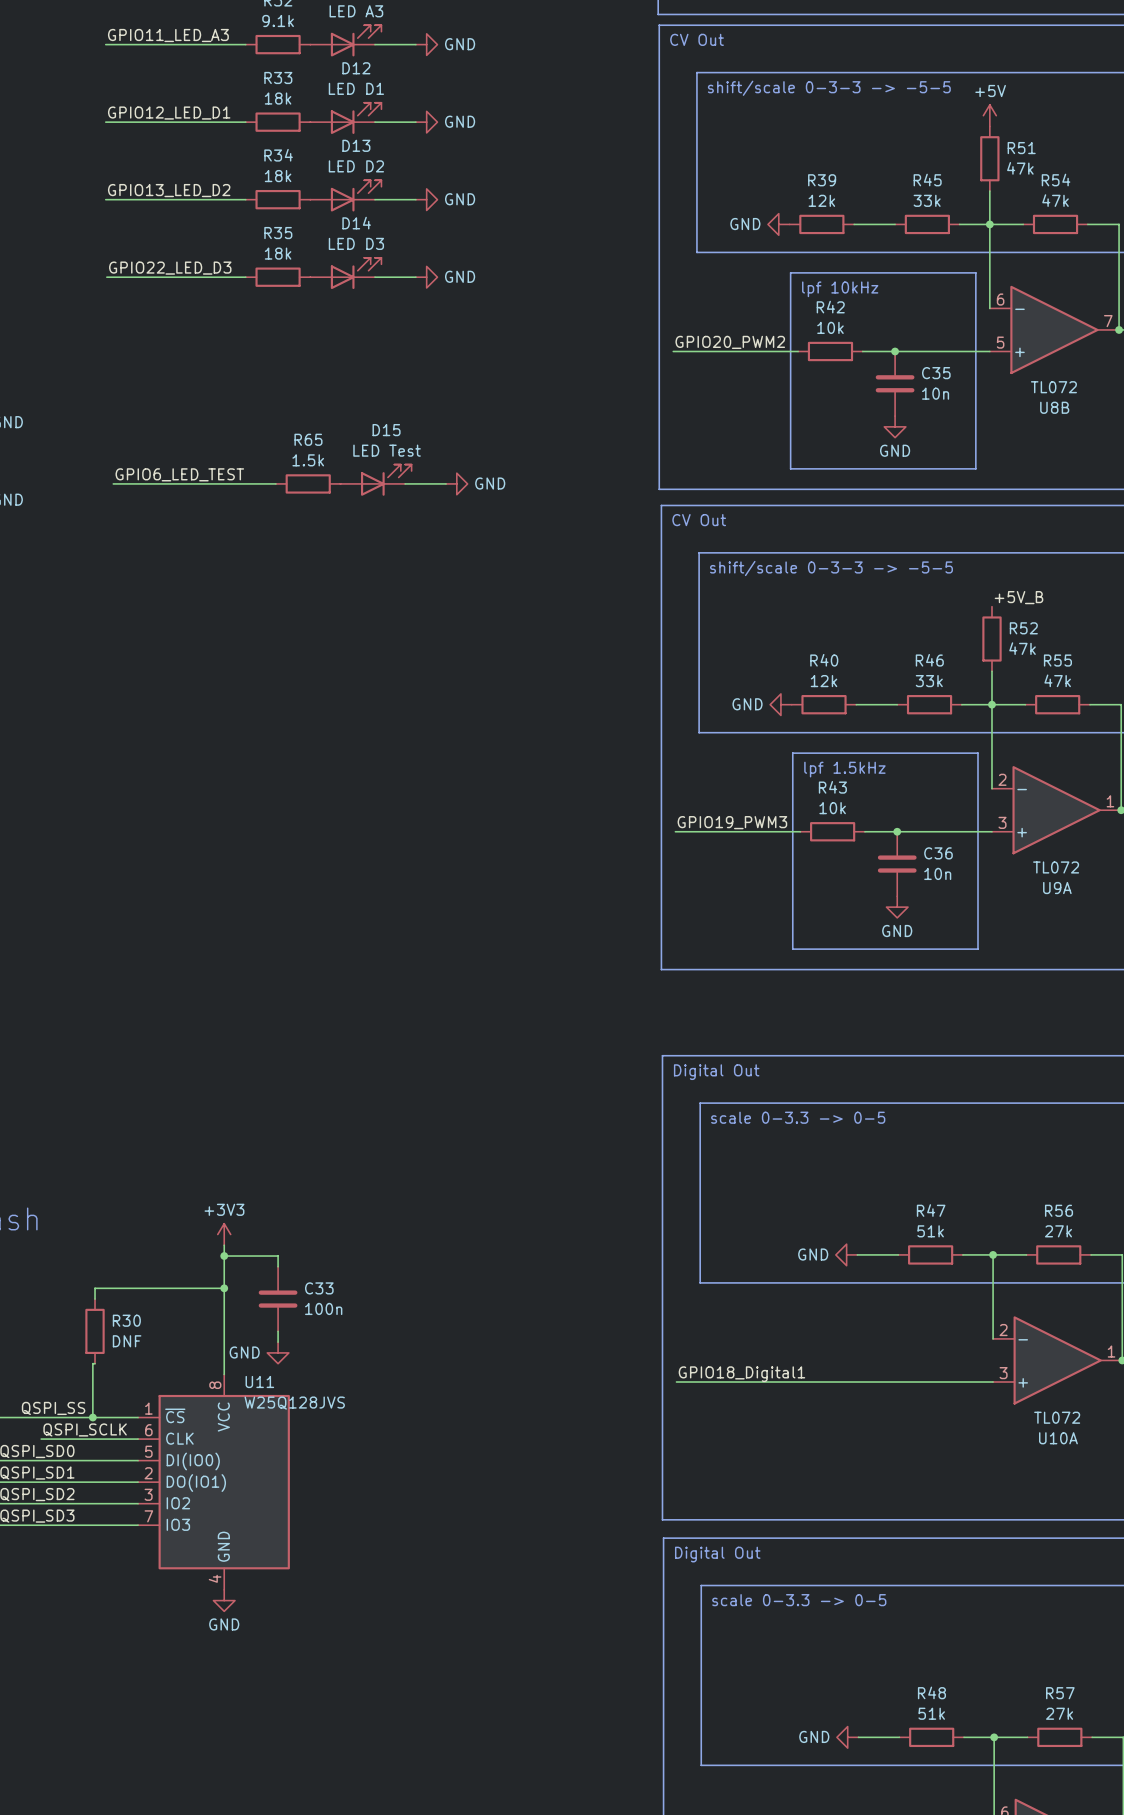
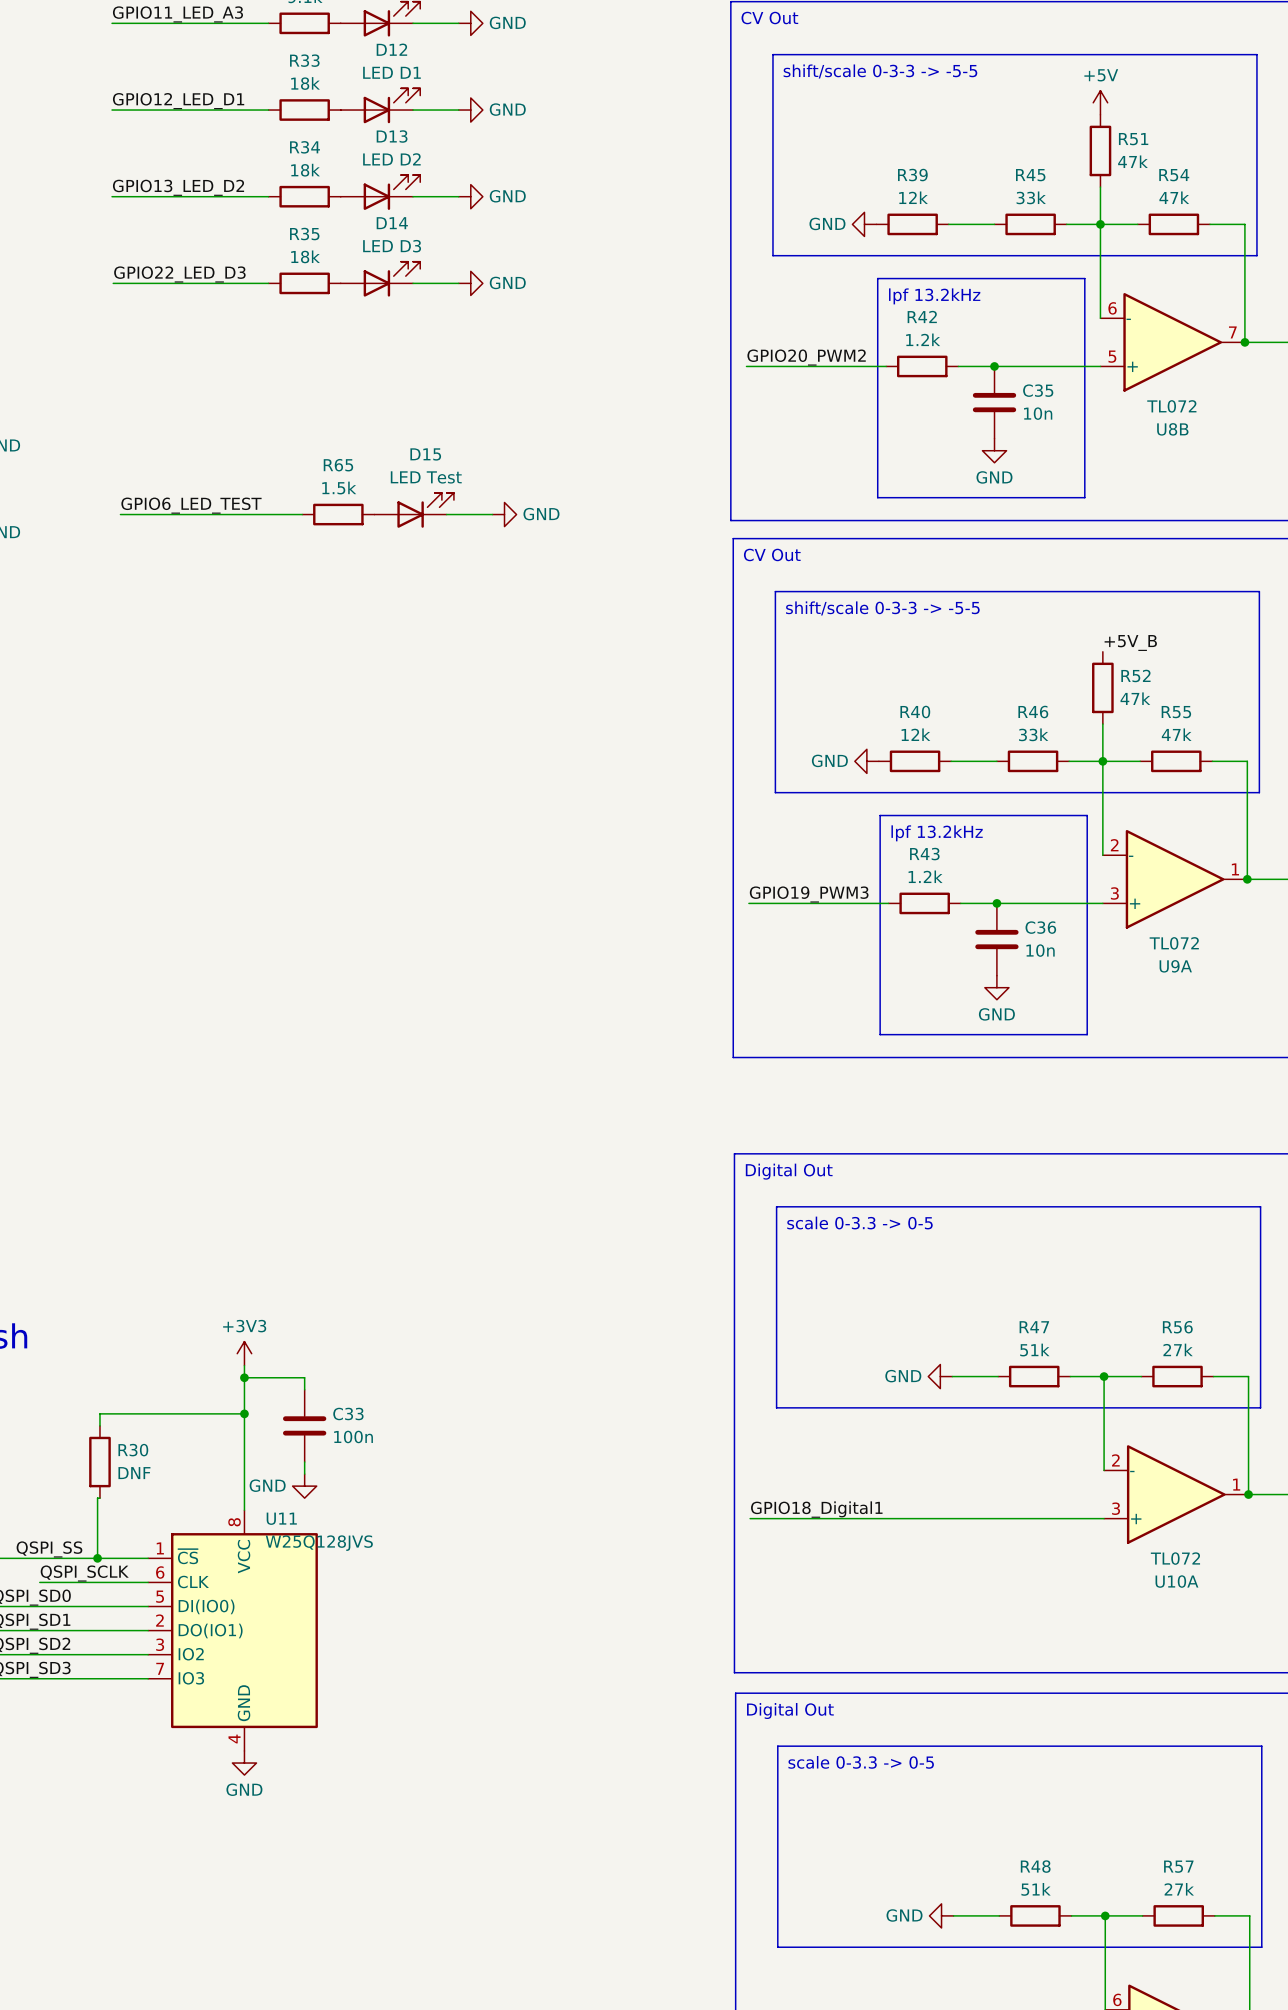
text: lpf 10kHz (840, 289) -> lpf 13.2kHz (934, 296)
R42 value: 10k (830, 327) -> 1.2k (923, 339)
text: lpf 1.5kHz (844, 769) -> lpf 13.2kHz (937, 833)
R43 value: 10k (832, 808) -> 1.2k (925, 876)

